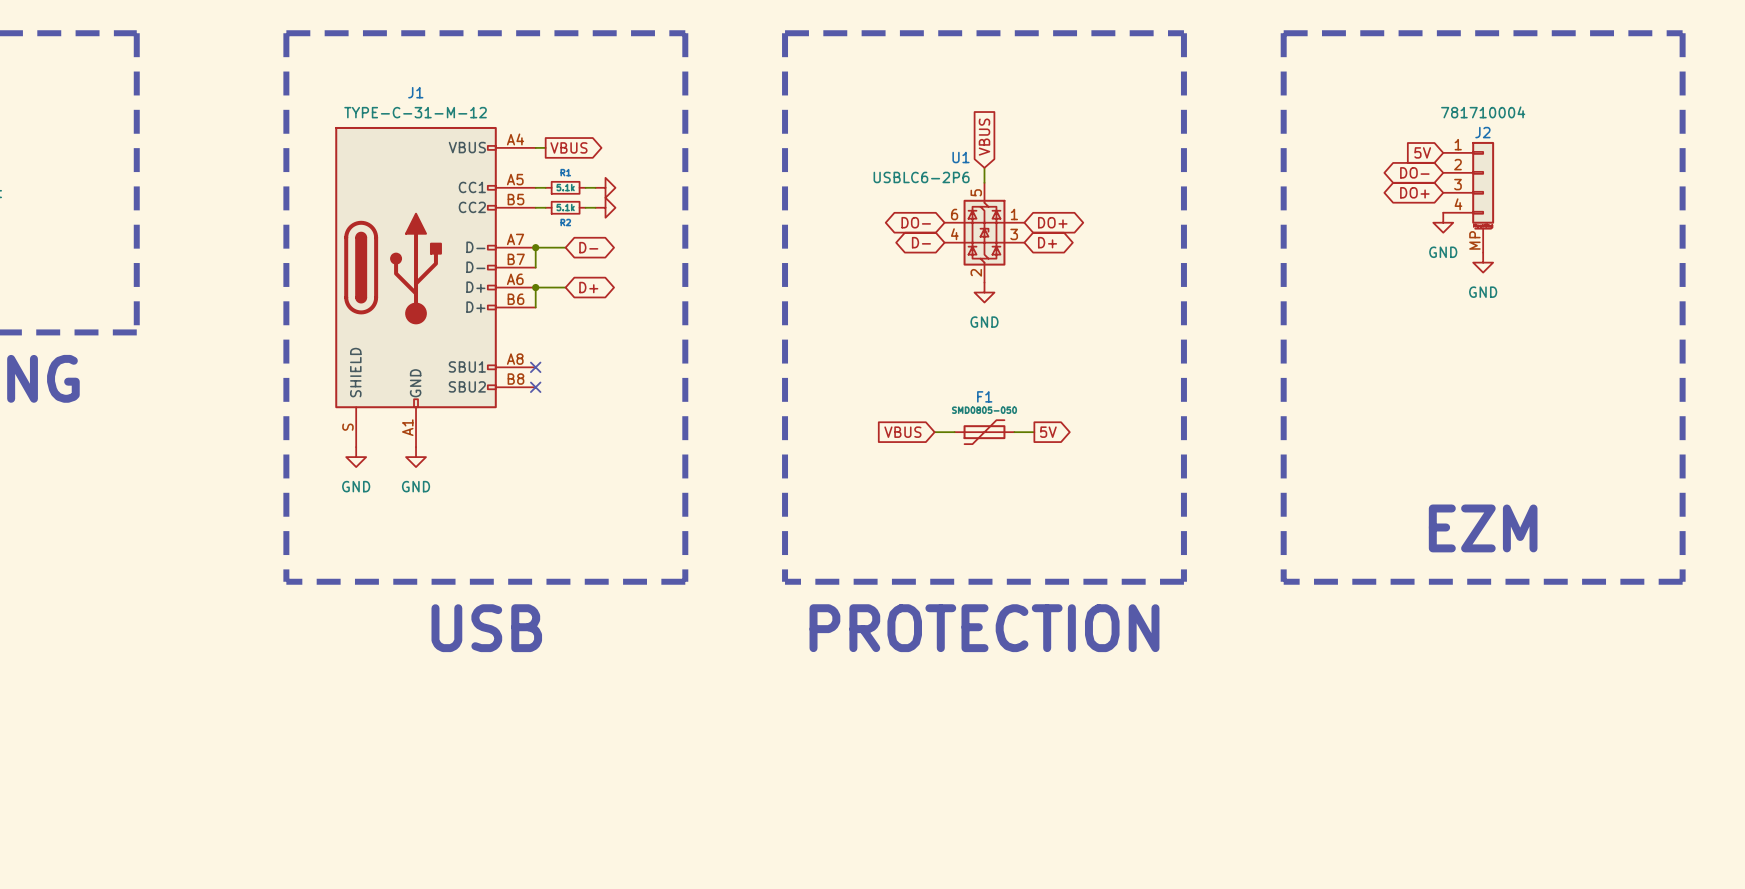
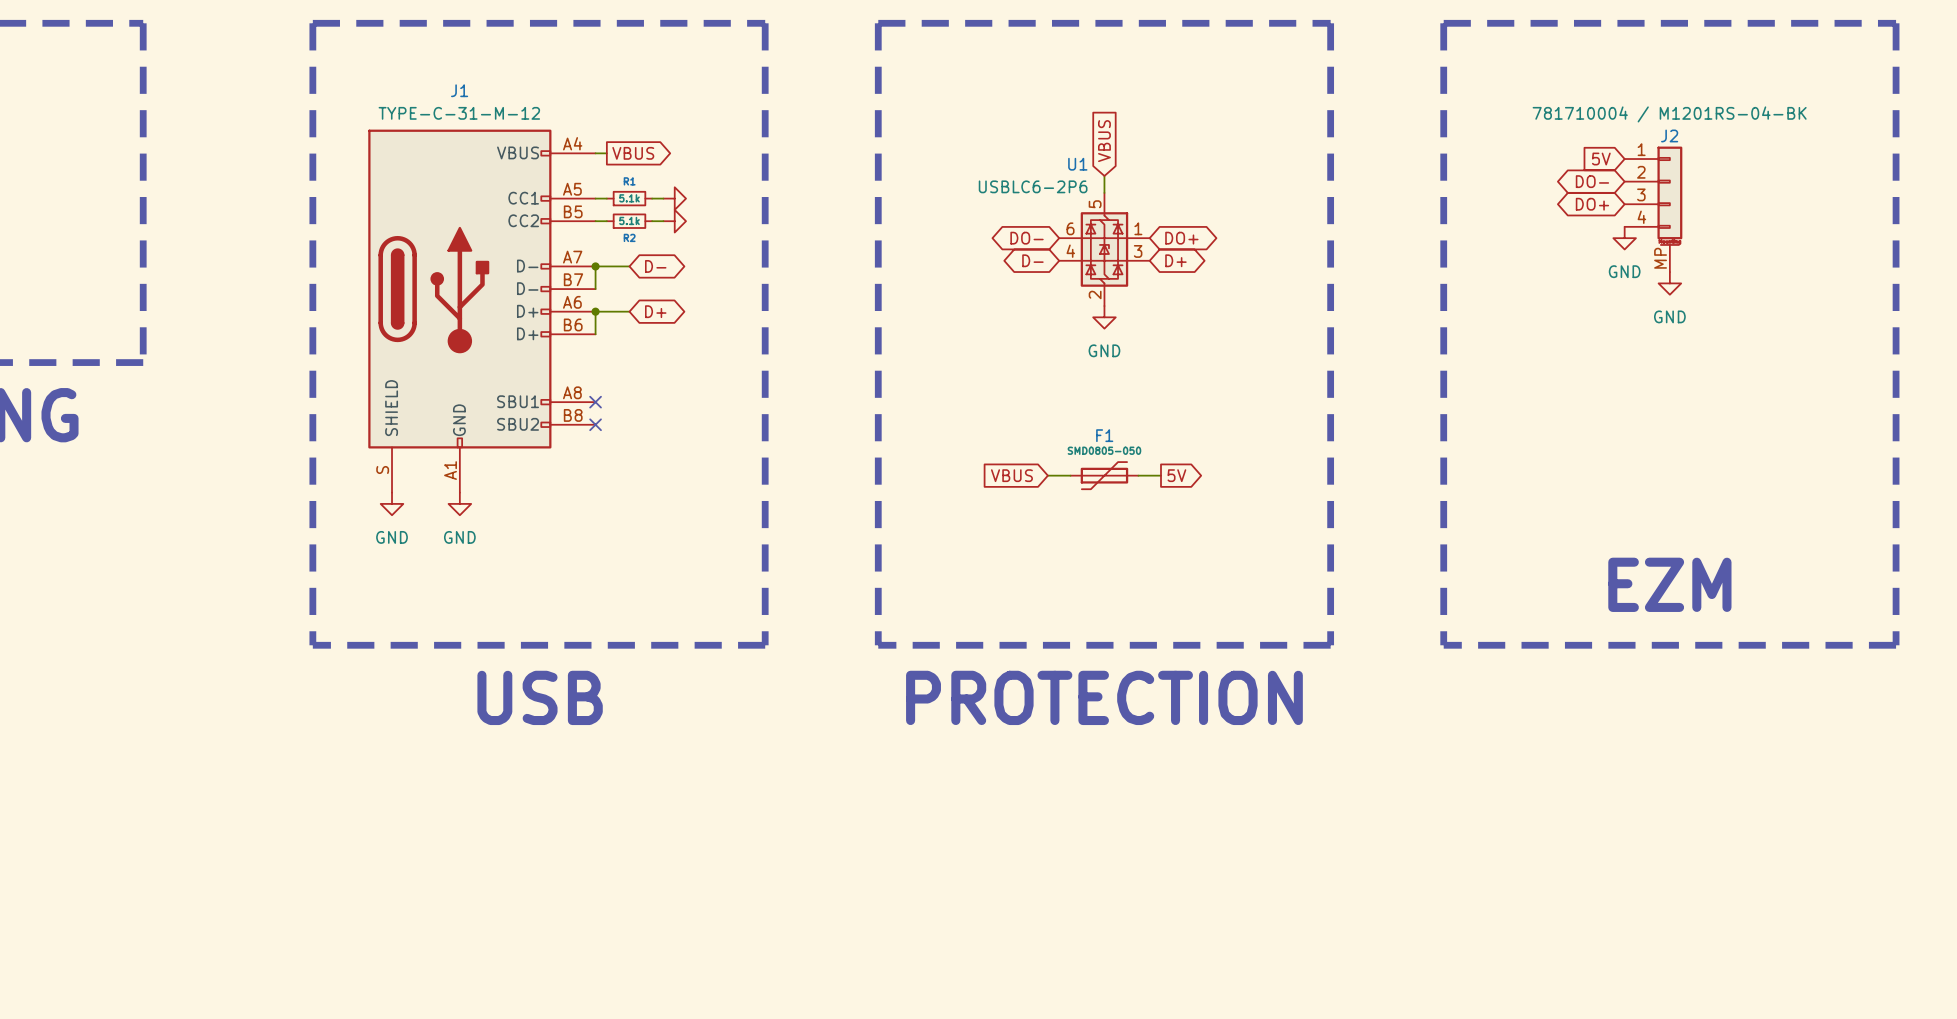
J2 value: 781710004 (1483, 112) -> 781710004 / M1201RS-04-BK (1669, 114)

